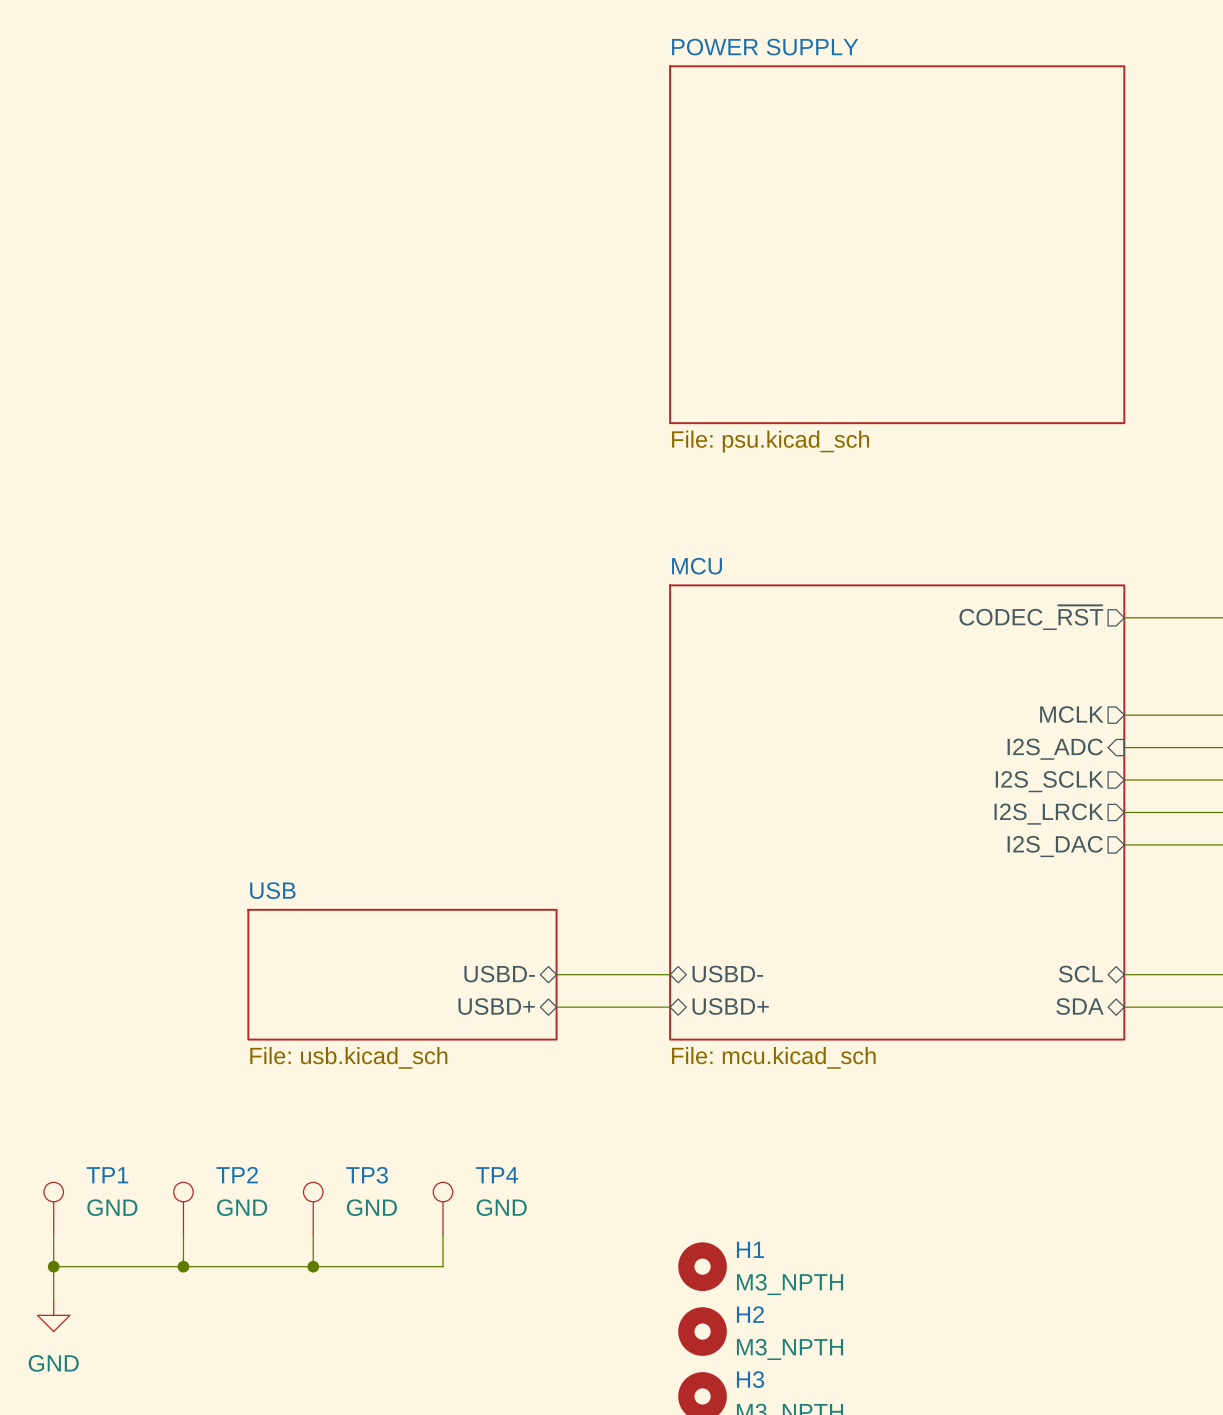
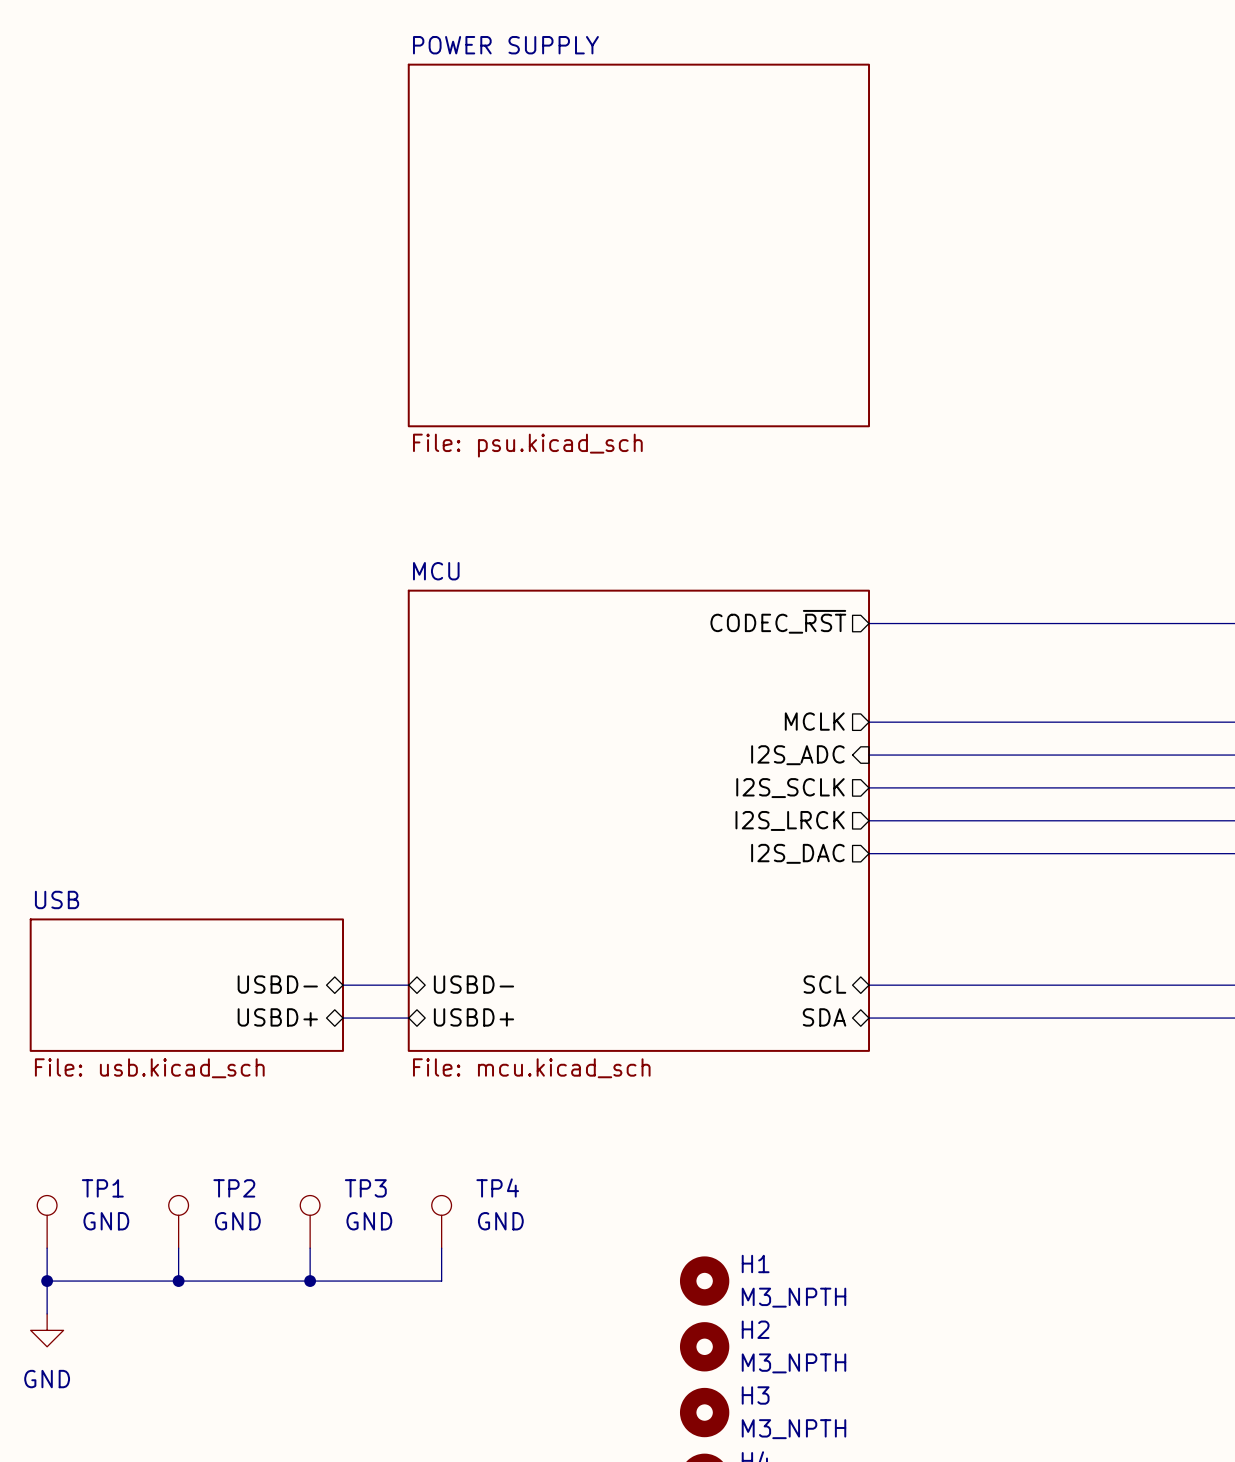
sheet POWER SUPPLY position: (897, 244) -> (638, 245)
wire: none -> (869, 623) (1132, 623)
sheet pin position: CODEC_~{RST} (1031, 617) -> CODEC_~{RST} (778, 621)
sheet pin position: MCLK (1071, 714) -> MCLK (814, 721)
wire: none -> (869, 722) (1132, 722)
wire: none -> (869, 755) (1132, 755)
sheet pin position: I2S_ADC (1055, 749) -> I2S_ADC (797, 755)
wire: none -> (869, 787) (1132, 787)
sheet pin position: I2S_SCLK (1049, 781) -> I2S_SCLK (790, 788)
wire: none -> (869, 820) (1132, 820)
sheet MCU position: (897, 812) -> (638, 820)
sheet pin position: I2S_LRCK (1048, 814) -> I2S_LRCK (790, 820)
wire: none -> (869, 853) (1132, 853)
sheet pin position: I2S_DAC (1055, 846) -> I2S_DAC (797, 853)
sheet pin: none -> USBD- (277, 984)
wire: none -> (343, 985) (408, 985)
sheet USB position: (402, 974) -> (186, 985)
sheet pin rotation: 0° (499, 974) -> 180° (473, 984)
wire: (556, 974) (670, 974) -> none
sheet pin: USBD- (727, 974) -> none
wire: none -> (869, 985) (1132, 985)
sheet pin position: SCL (1080, 974) -> SCL (824, 984)
sheet pin: none -> USBD+ (277, 1017)
sheet pin rotation: 0° (496, 1006) -> 180° (473, 1017)
sheet pin: USBD+ (730, 1006) -> none
sheet pin position: SDA (1079, 1006) -> SDA (824, 1017)
wire: none -> (343, 1018) (408, 1018)
wire: (556, 1007) (670, 1007) -> none
wire: none -> (869, 1018) (1132, 1018)

